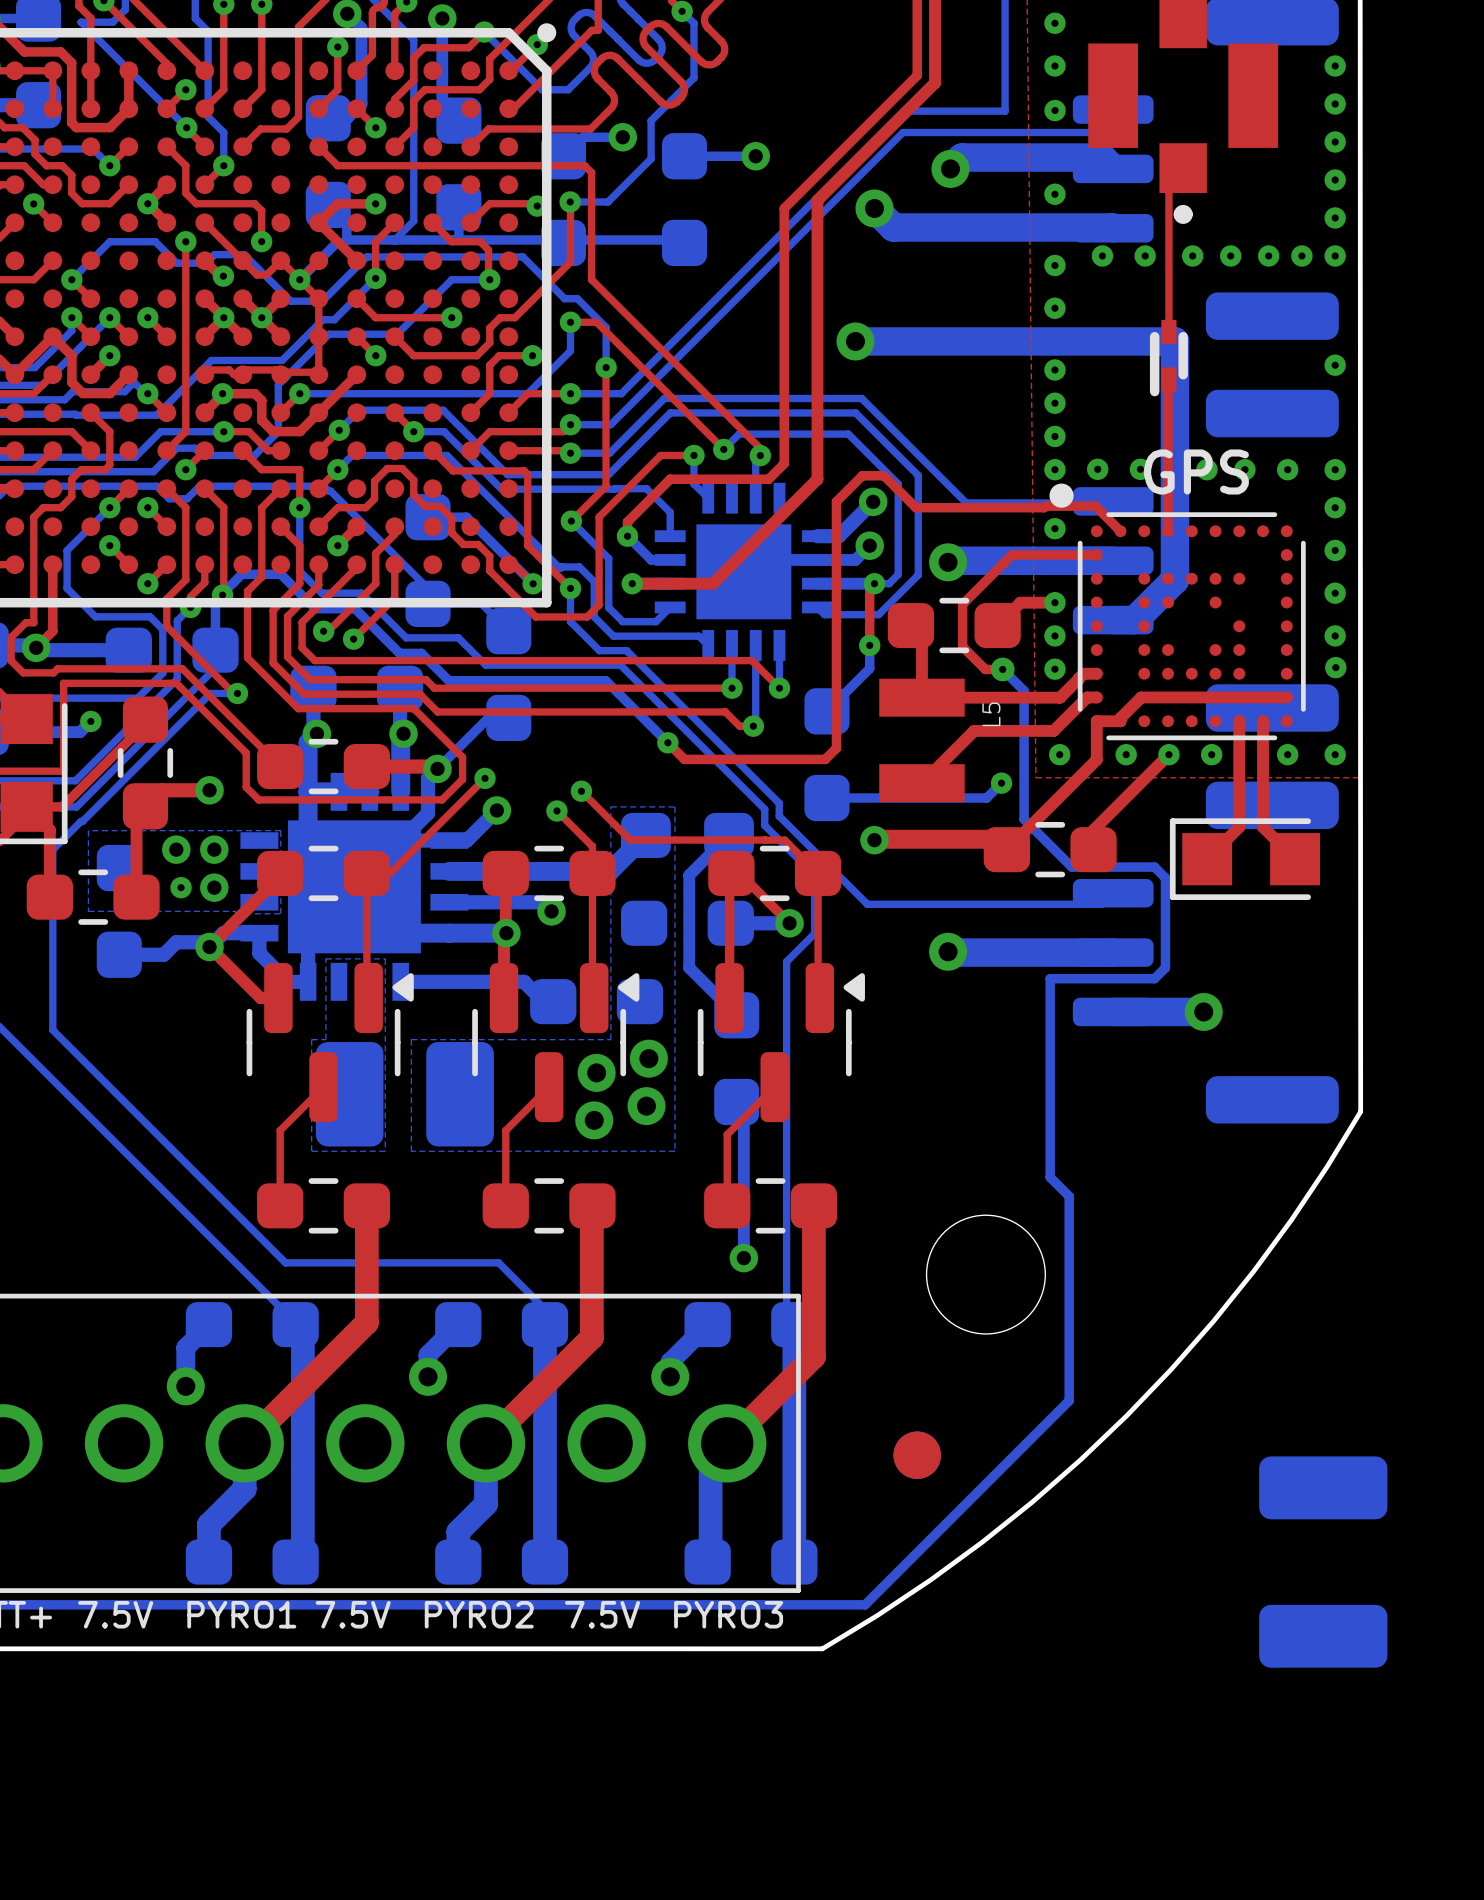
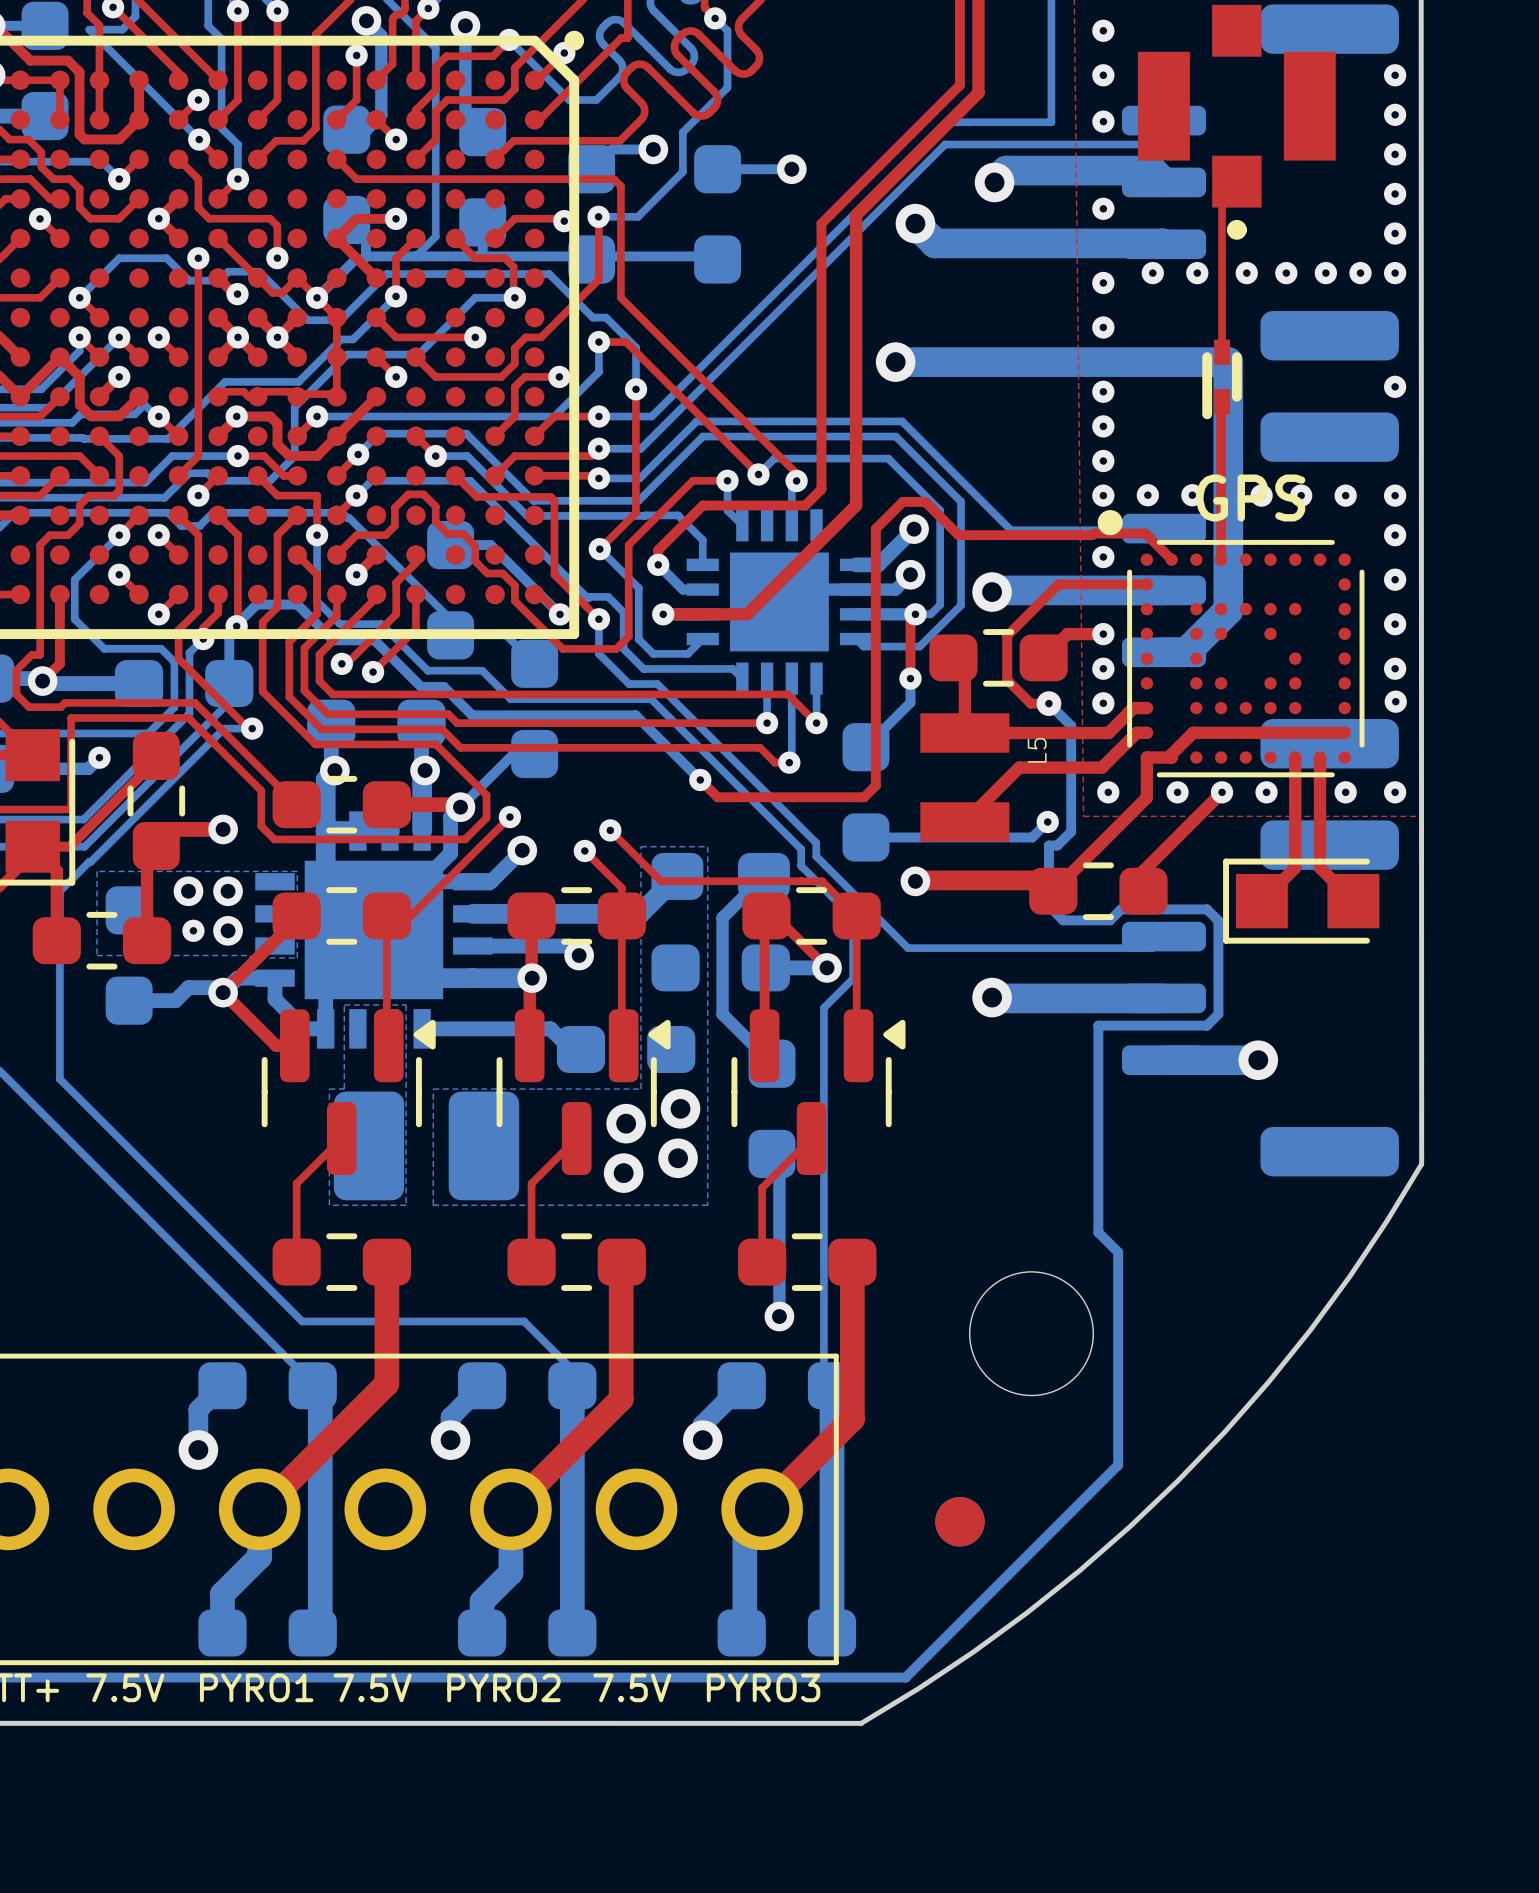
bottom track: (1024, 792) (1024, 819) (1071, 867) -> (1071, 831) (1057, 845) (1048, 845) (1048, 906) (1063, 920) (1110, 920) (1121, 909)
part: (1323, 1562) -> none

